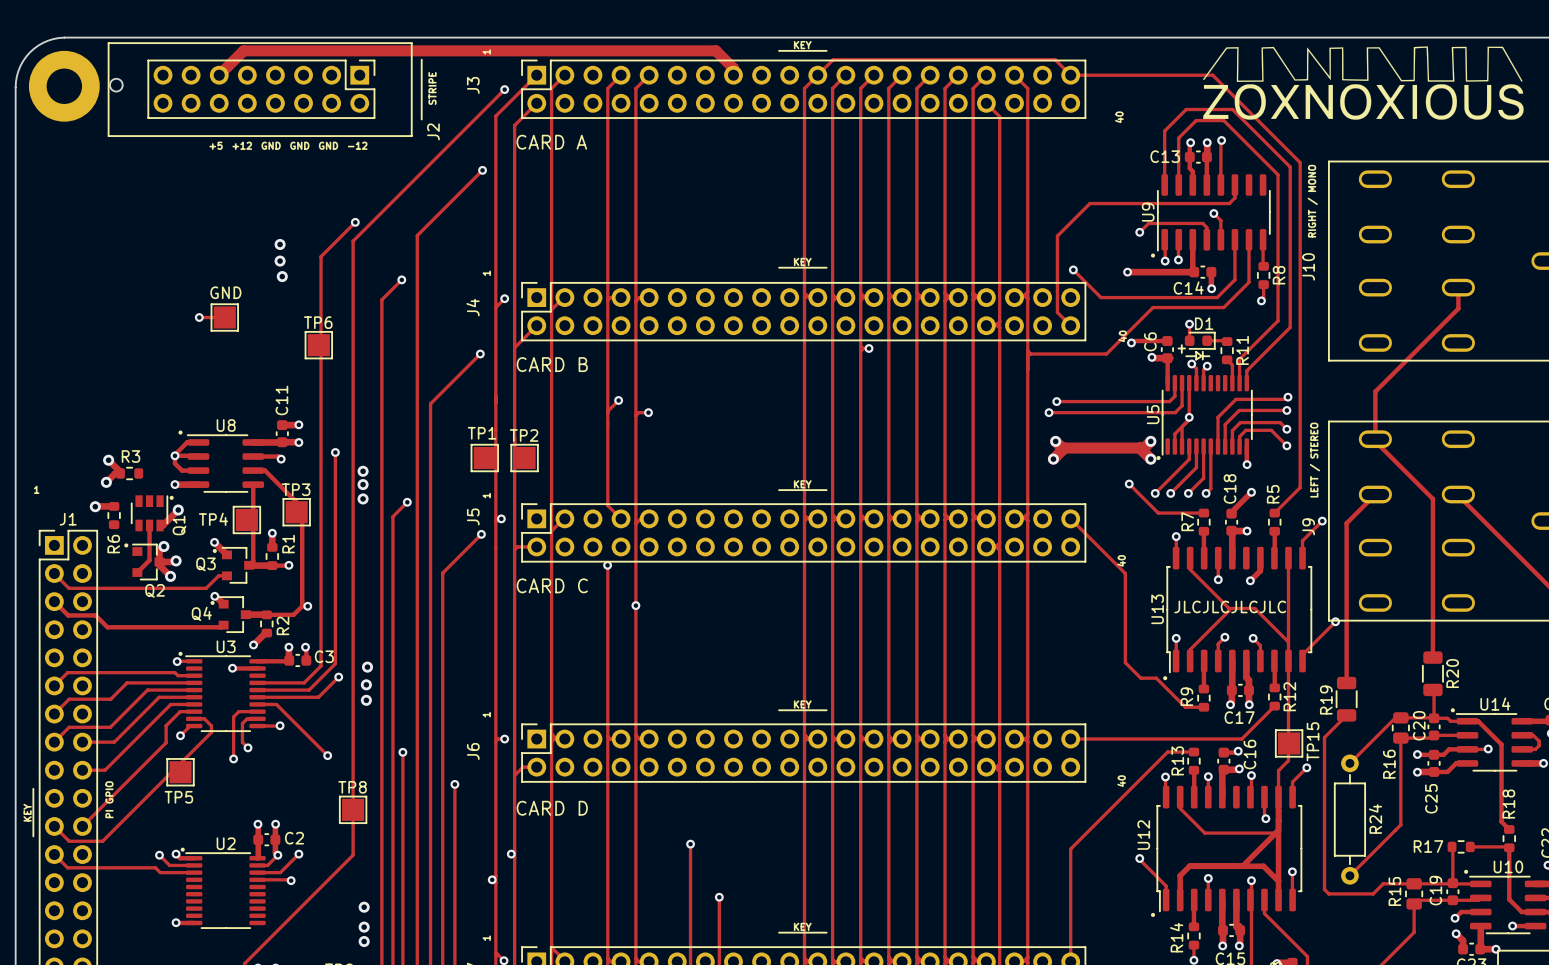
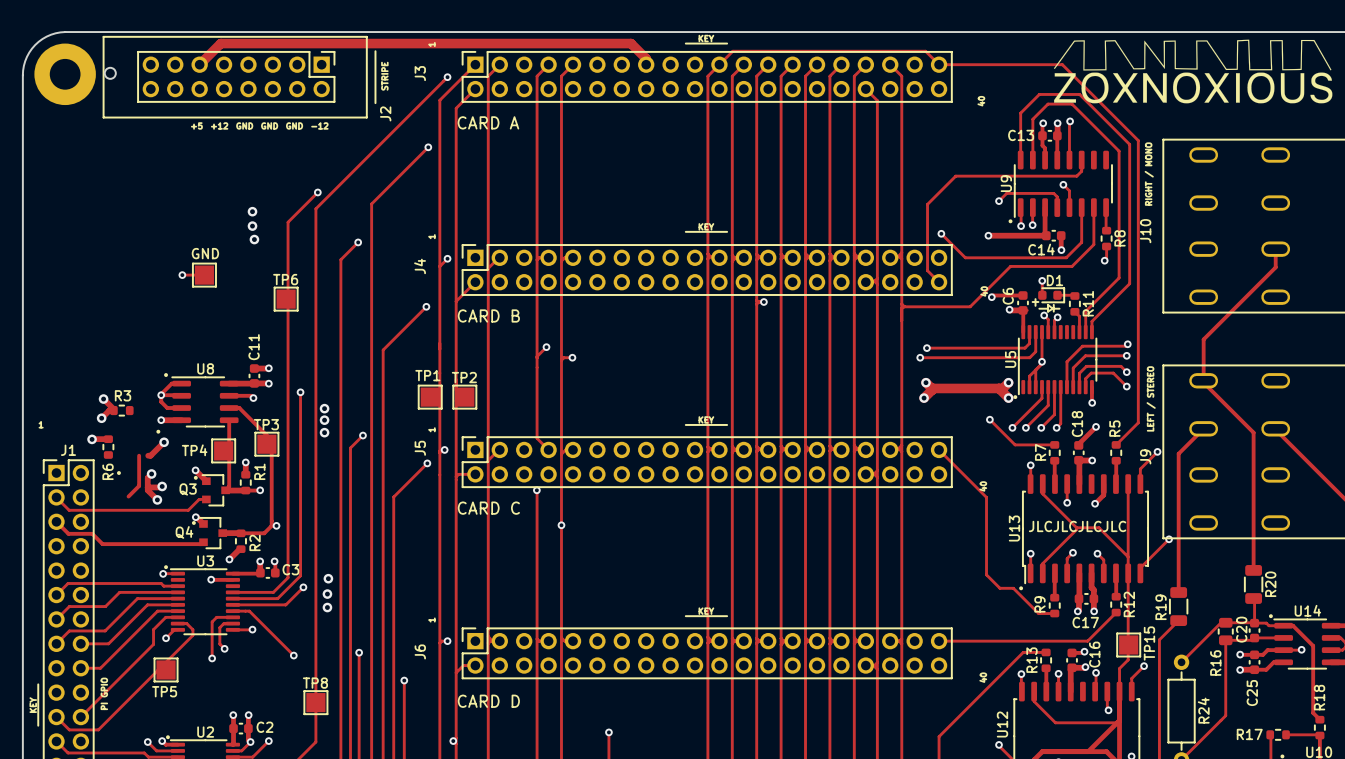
Q1: (149, 513) -> none
Q2: (148, 562) -> none

